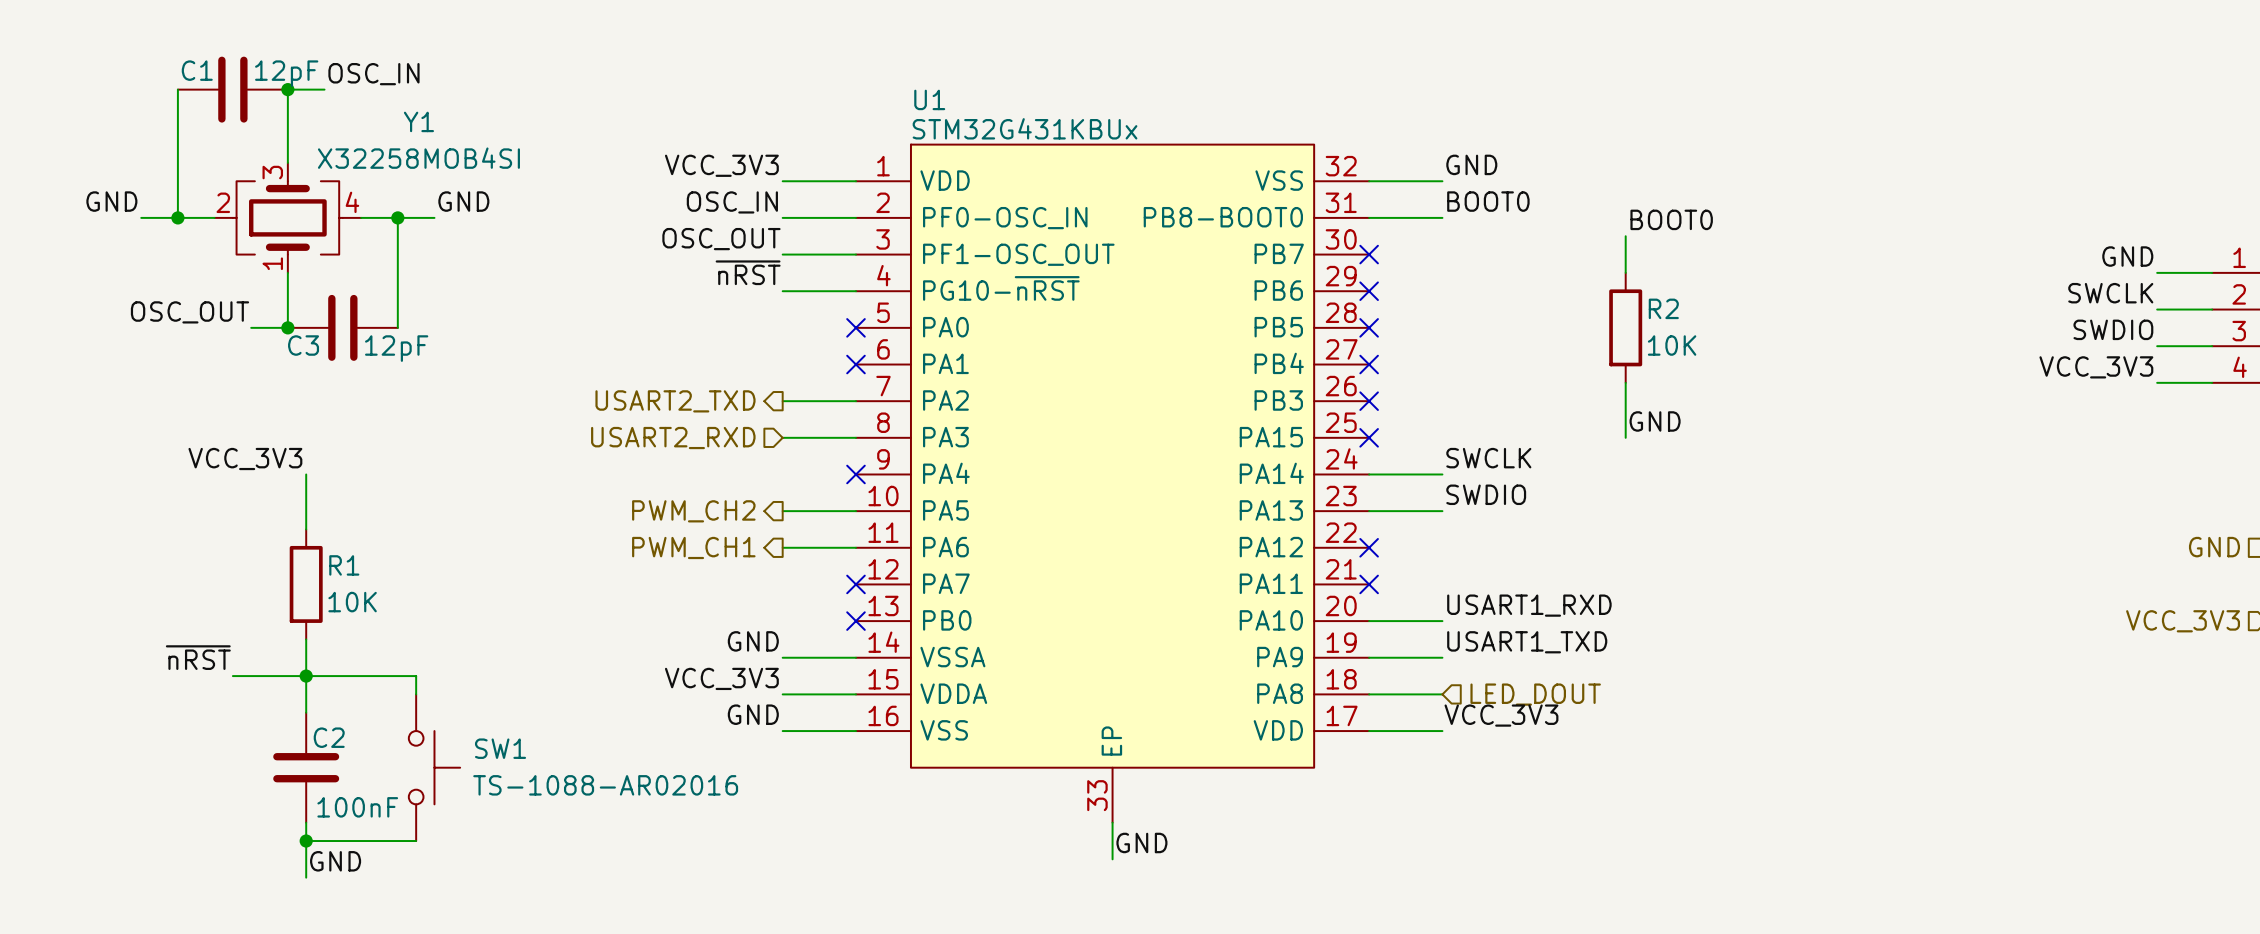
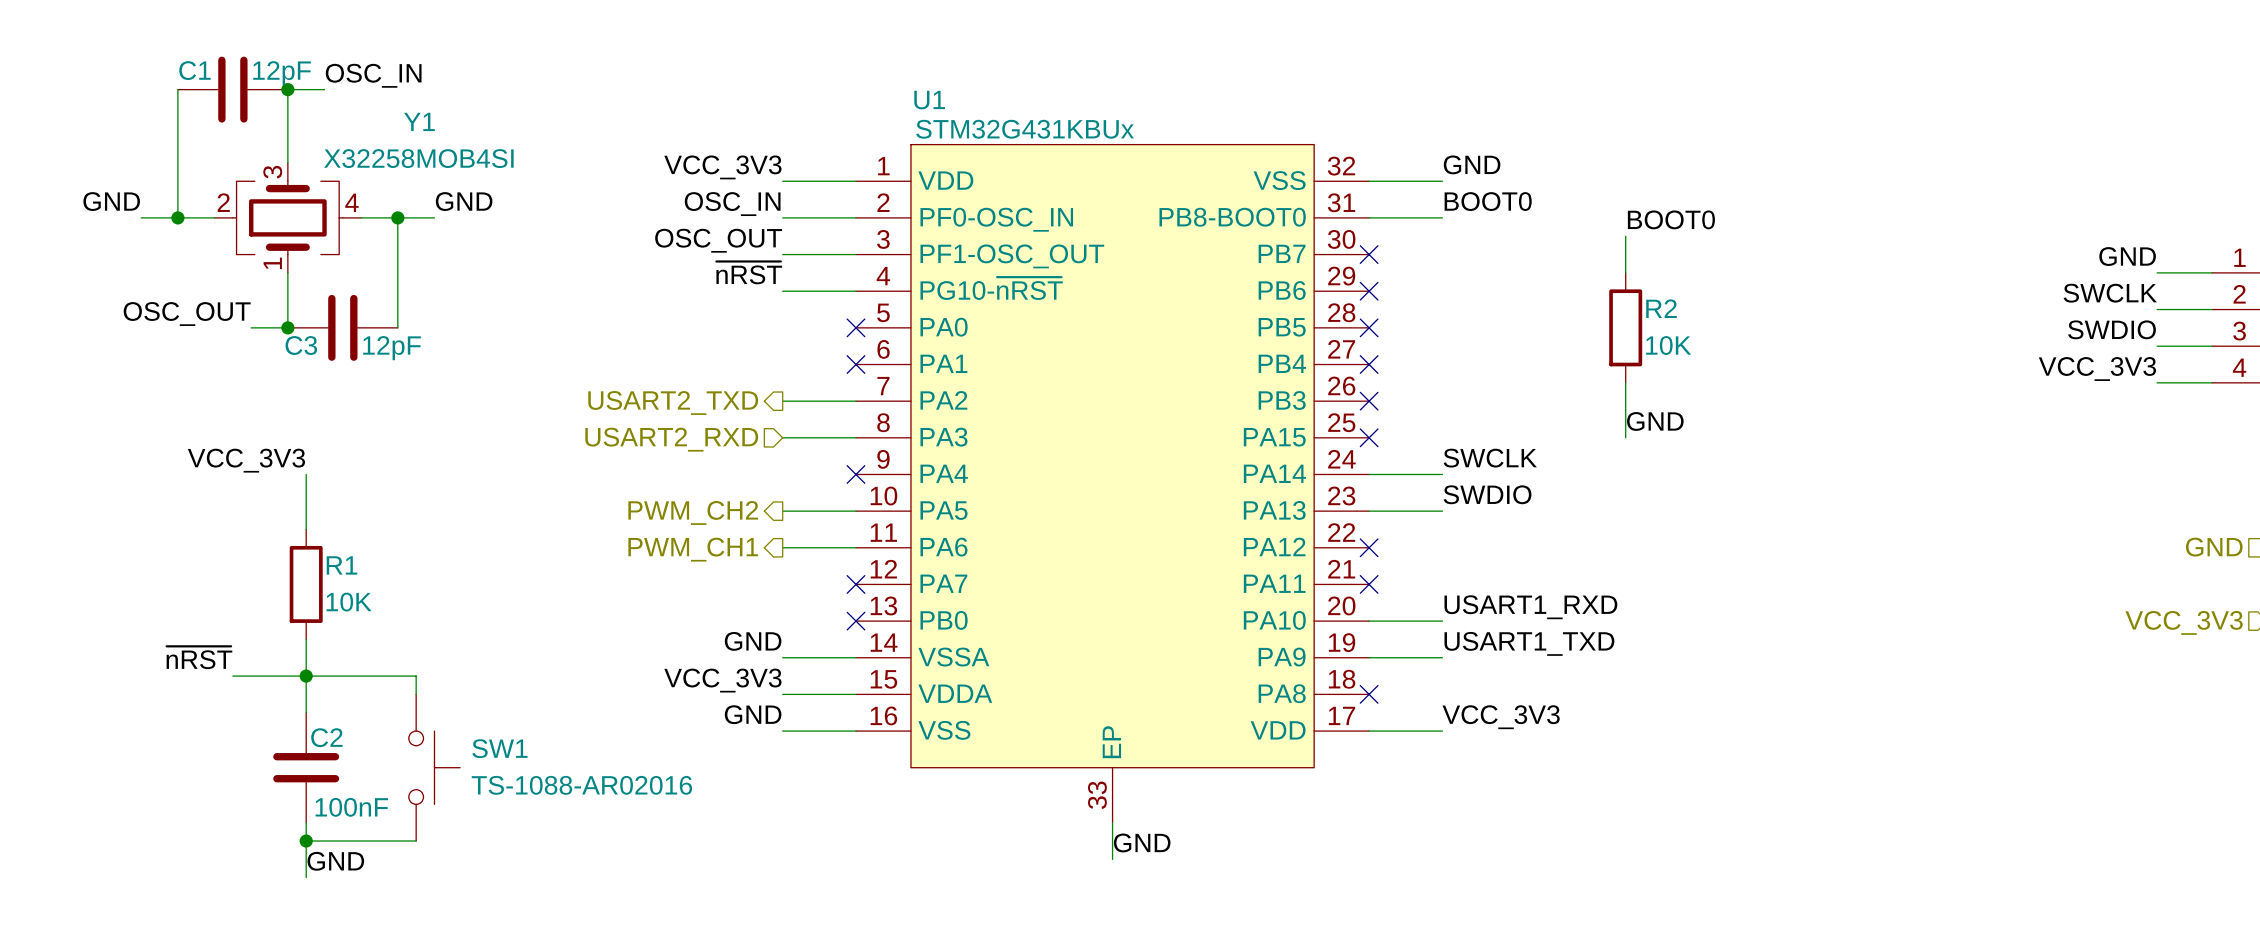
wire: (1369, 694) (1442, 694) -> none
no-connect mark: none -> (1369, 694)
hierarchical label: LED_DOUT (1535, 694) -> none

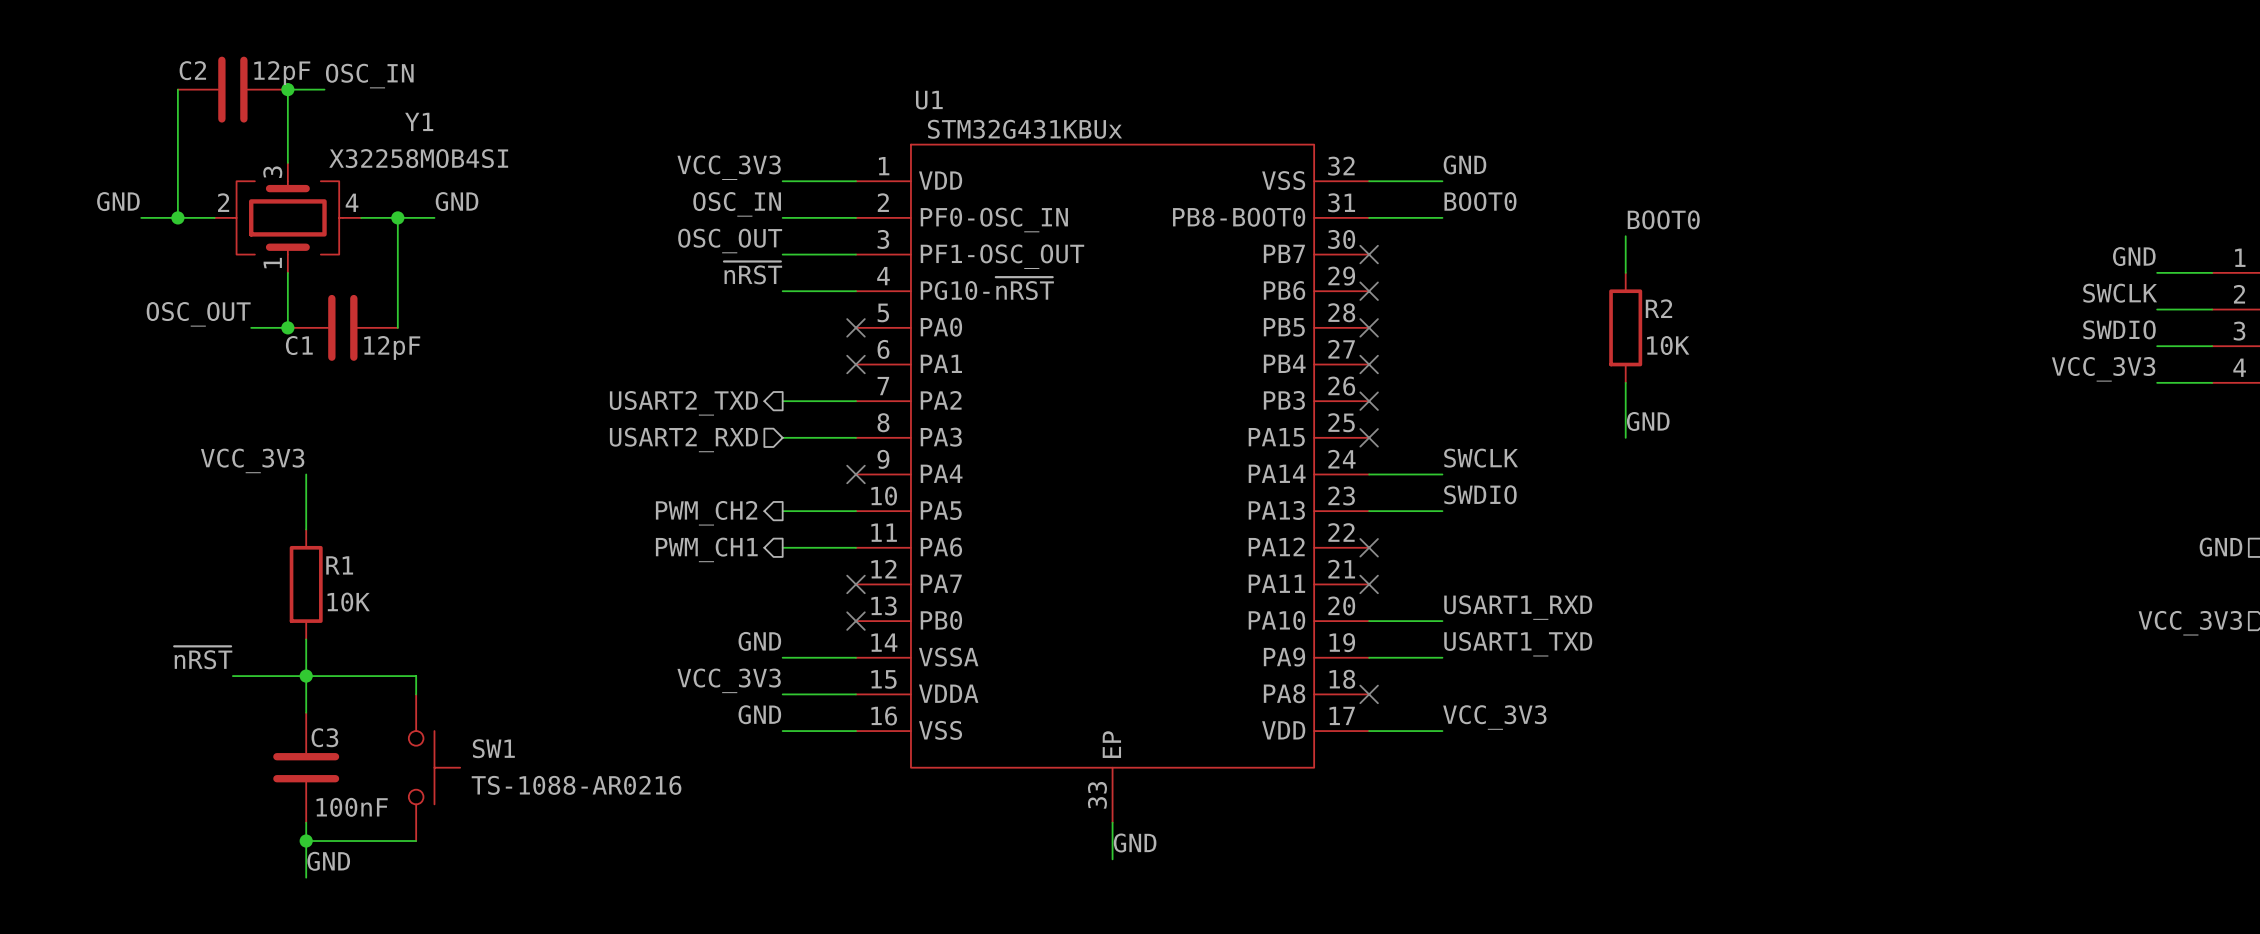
C1 name: C1 (194, 70) -> C2 (192, 70)
C3 name: C3 (301, 345) -> C1 (299, 345)
C2 name: C2 (326, 737) -> C3 (324, 737)
SW1 value: TS-1088-AR02016 (581, 785) -> TS-1088-AR0216 (576, 785)

